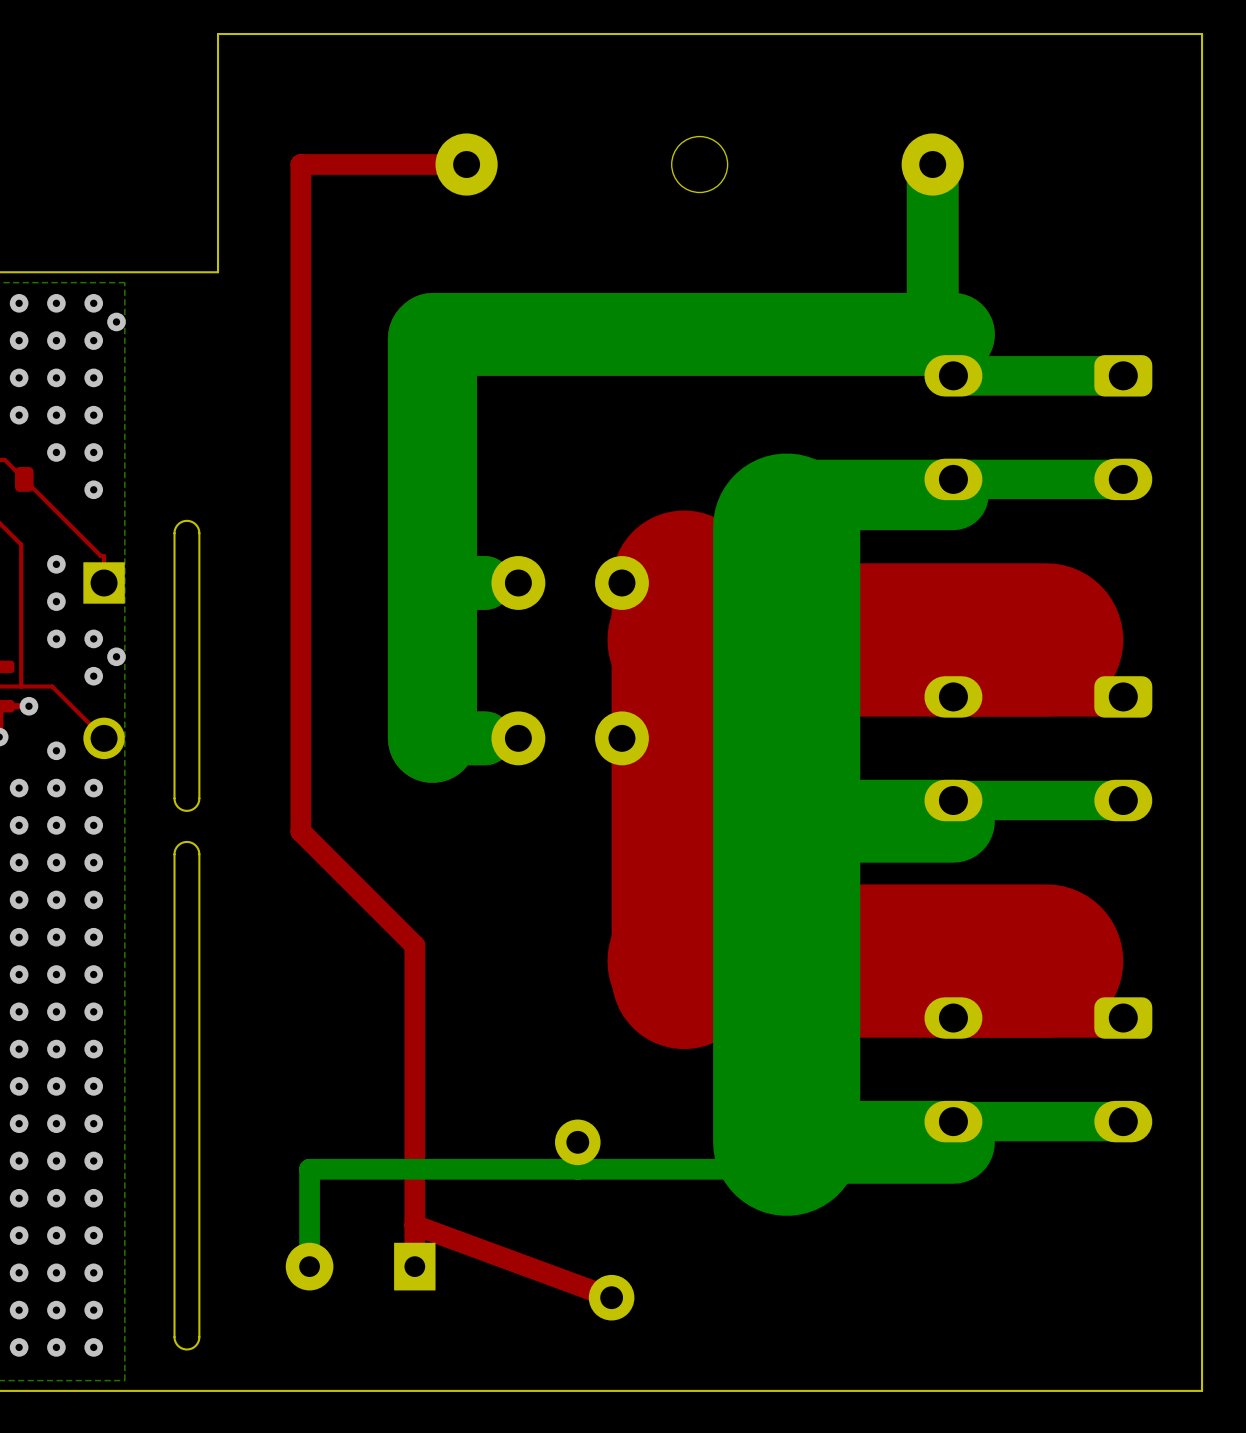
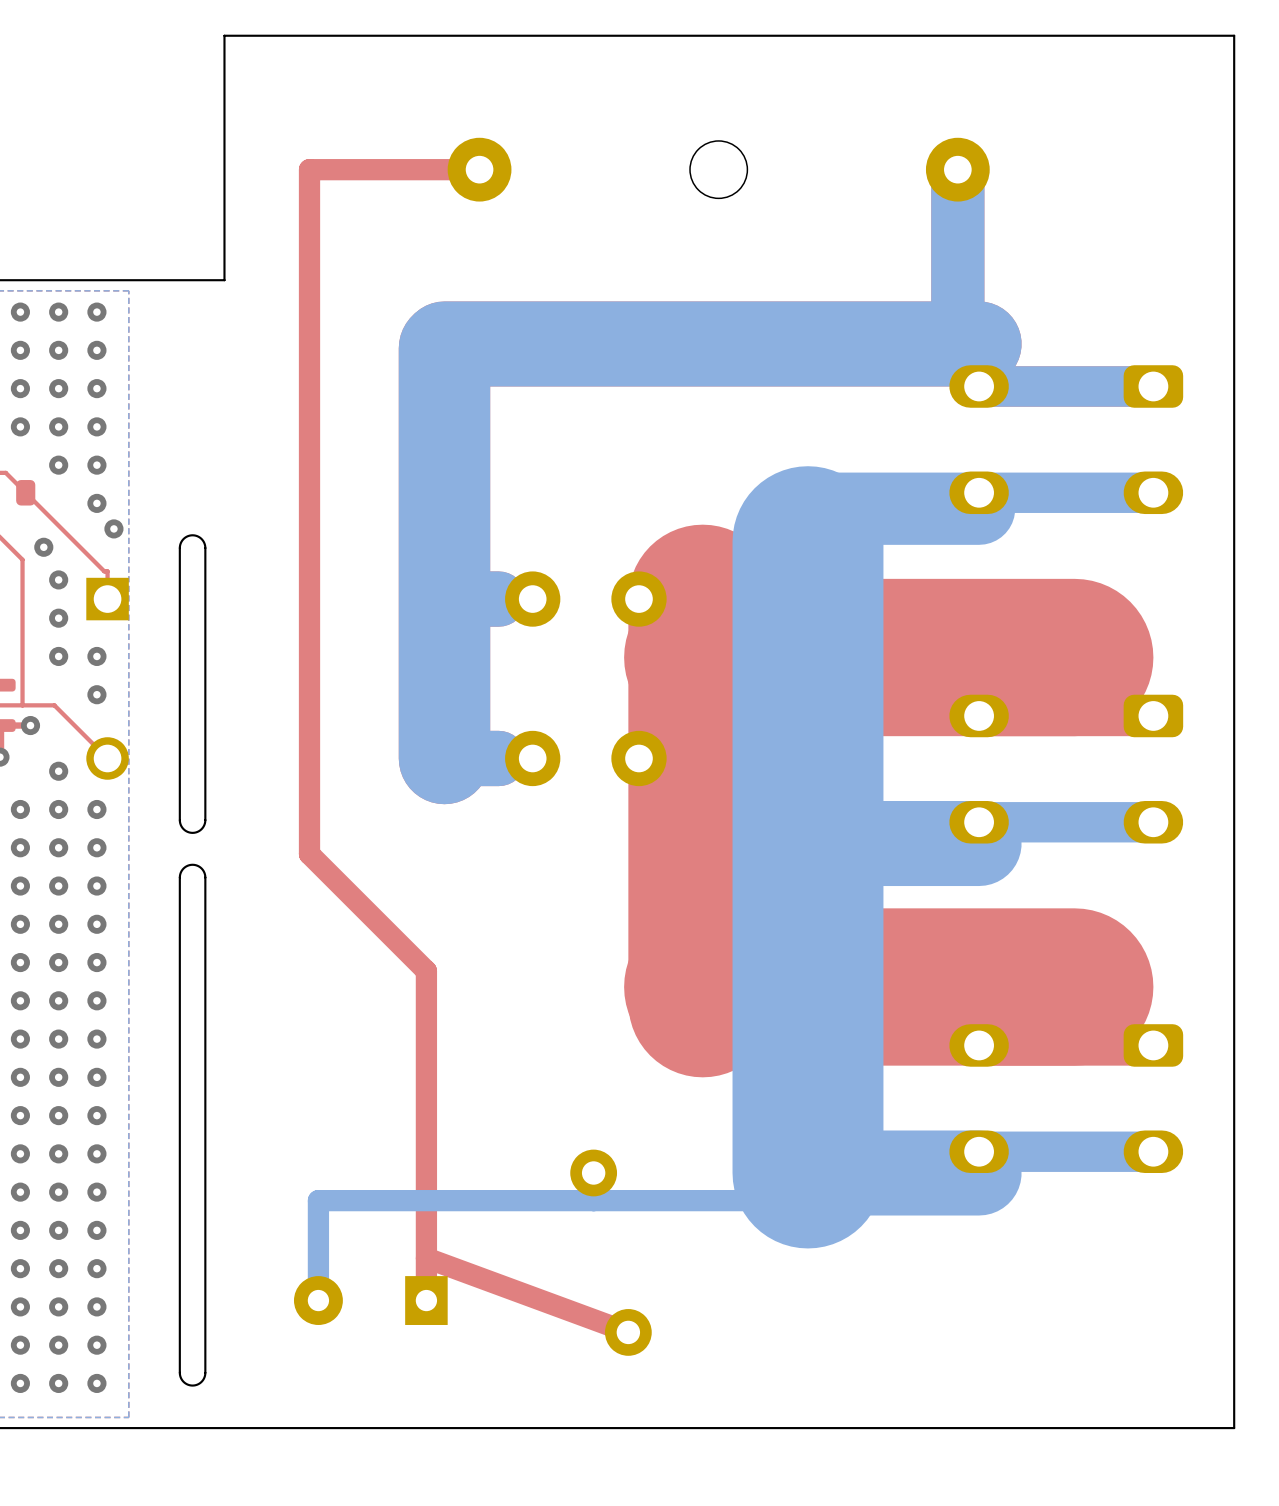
via: (116, 321) -> none
via: none -> (113, 528)
via: none -> (43, 547)
via: (116, 656) -> none

